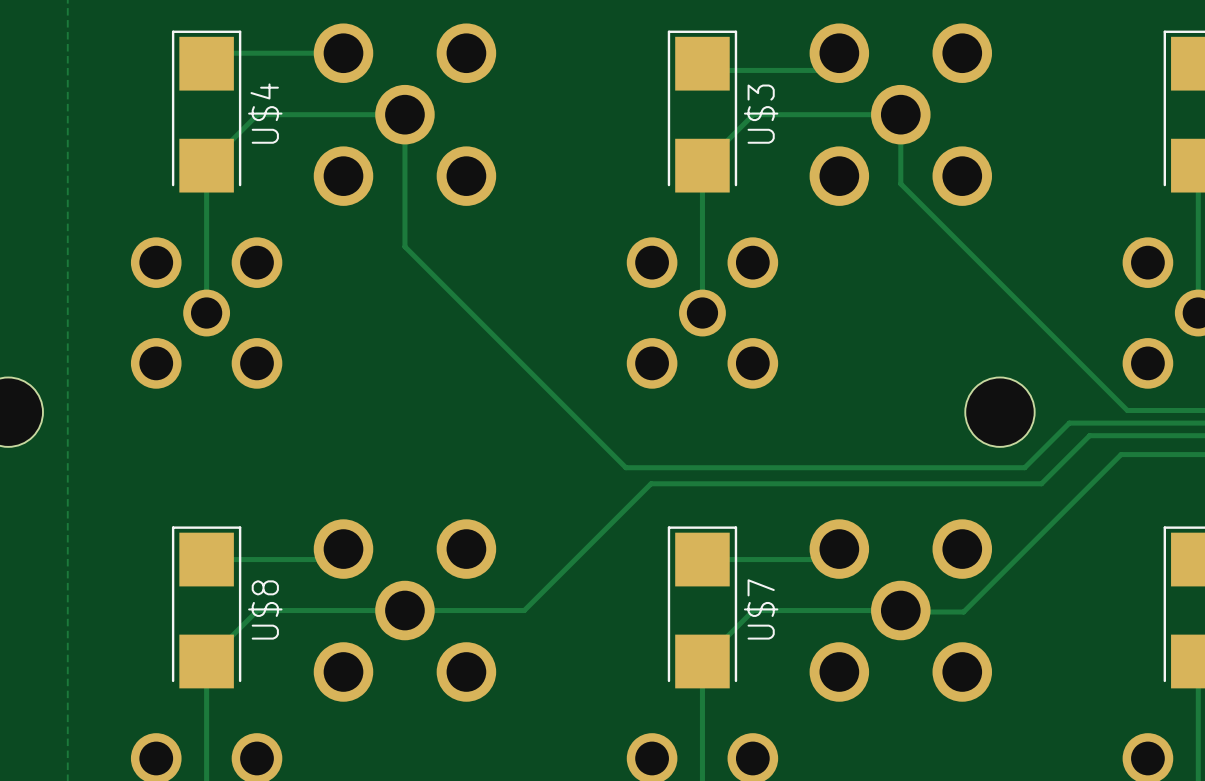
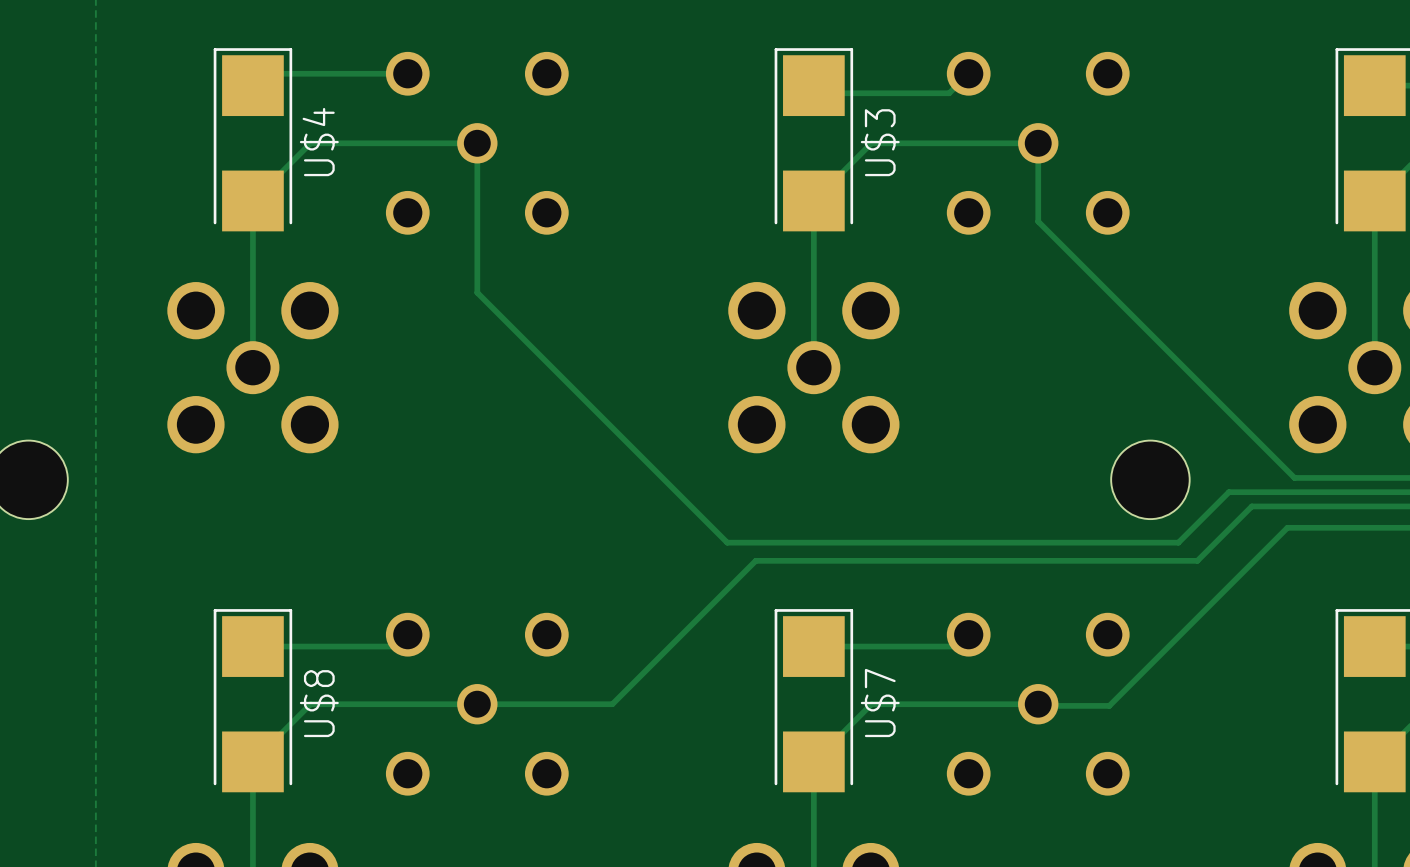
part footprint: [313, 23, 497, 206] -> [385, 51, 569, 235]
part footprint: [809, 23, 993, 206] -> [946, 51, 1130, 235]
part footprint: [313, 519, 497, 702] -> [385, 612, 569, 796]
part footprint: [809, 519, 993, 702] -> [946, 612, 1130, 796]

